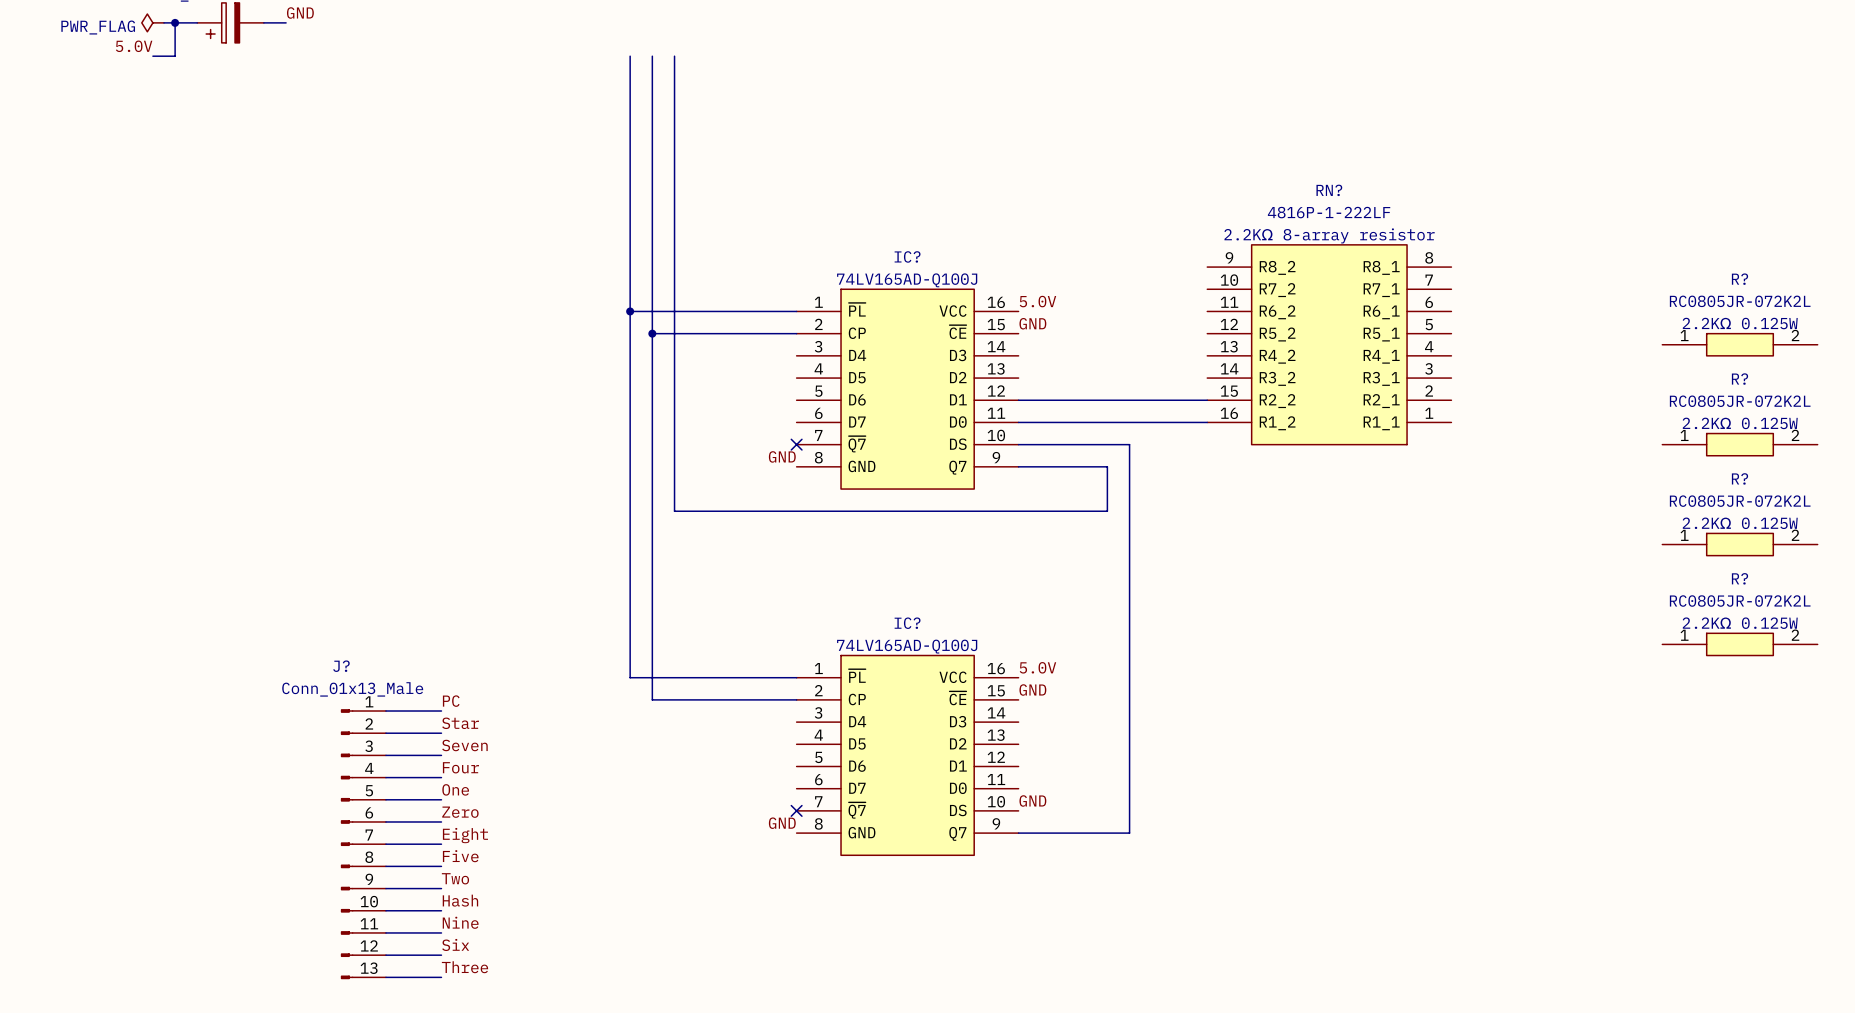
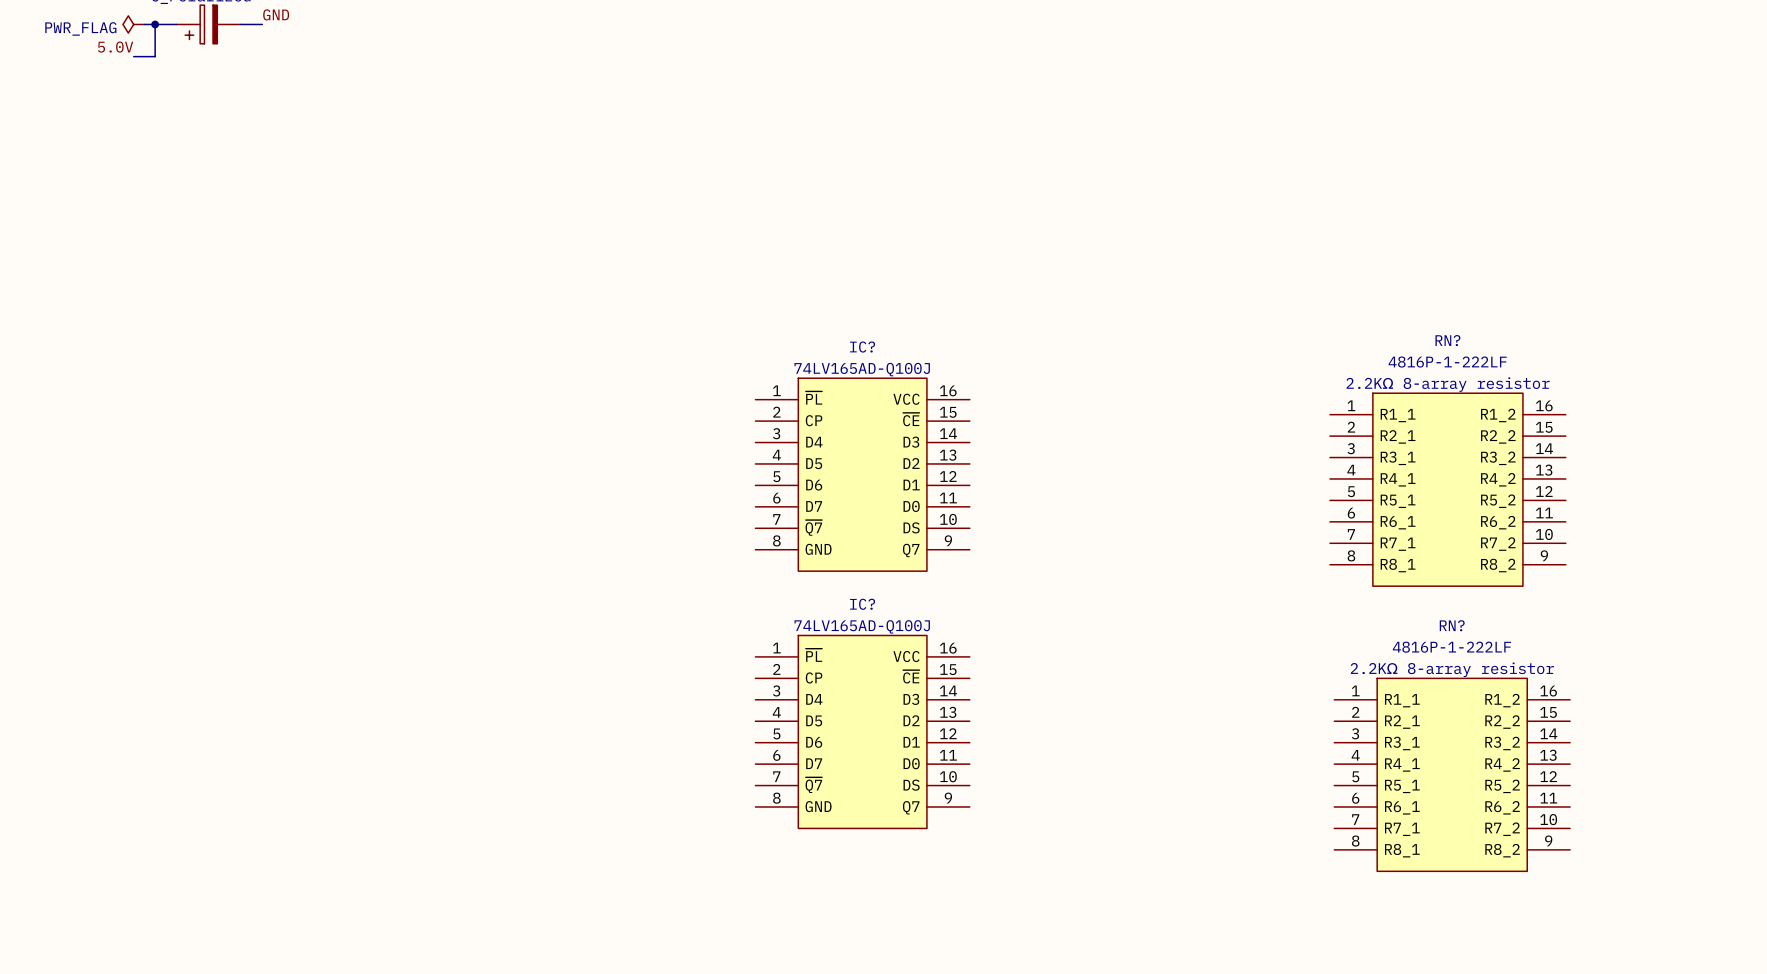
wire: (630, 56) (630, 677) (796, 677) -> none
wire: (652, 56) (652, 699) (796, 699) -> none
wire: (674, 56) (674, 511) (1107, 511) (1107, 466) (1018, 466) -> none
label: 5.0V (1037, 301) -> none
wire: (630, 311) (796, 311) -> none
junction: (630, 311) -> none
label: GND (1032, 323) -> none
wire: (652, 333) (796, 333) -> none
junction: (652, 333) -> none
RN?: 4816P-1-222LF (1329, 344) -> none
R?: RC0805JR-072K2L (1739, 344) -> none
IC? position: (907, 389) -> (862, 474)
wire: (1018, 400) (1207, 400) -> none
wire: (1018, 422) (1207, 422) -> none
no-connect mark: (796, 444) -> none
wire: (1018, 444) (1129, 444) (1129, 833) (1018, 833) -> none
R?: RC0805JR-072K2L (1739, 444) -> none
label: GND (782, 456) -> none
RN?: none -> 4816P-1-222LF (1447, 489)
R?: RC0805JR-072K2L (1739, 544) -> none
R?: RC0805JR-072K2L (1739, 644) -> none
label: 5.0V (1037, 667) -> none
label: GND (1032, 690) -> none
label: PC (451, 701) -> none
wire: (385, 711) (441, 711) -> none
label: Star (460, 723) -> none
wire: (385, 733) (441, 733) -> none
label: Seven (464, 745) -> none
wire: (385, 755) (441, 755) -> none
label: Four (460, 767) -> none
wire: (385, 777) (441, 777) -> none
label: One (455, 789) -> none
wire: (385, 799) (441, 799) -> none
RN?: none -> 4816P-1-222LF (1452, 774)
label: GND (1032, 800) -> none
no-connect mark: (796, 810) -> none
label: Zero (460, 812) -> none
wire: (385, 821) (441, 821) -> none
label: GND (782, 823) -> none
label: Eight (465, 835) -> none
J?: Conn_01x13_Male (363, 844) -> none
wire: (385, 844) (441, 844) -> none
label: Five (460, 856) -> none
wire: (385, 866) (441, 866) -> none
label: Two (455, 878) -> none
wire: (385, 888) (441, 888) -> none
label: Hash (460, 900) -> none
wire: (385, 910) (441, 910) -> none
label: Nine (460, 922) -> none
wire: (385, 932) (441, 932) -> none
label: Six (455, 944) -> none
wire: (385, 955) (441, 955) -> none
label: Three (464, 967) -> none
wire: (385, 977) (441, 977) -> none

